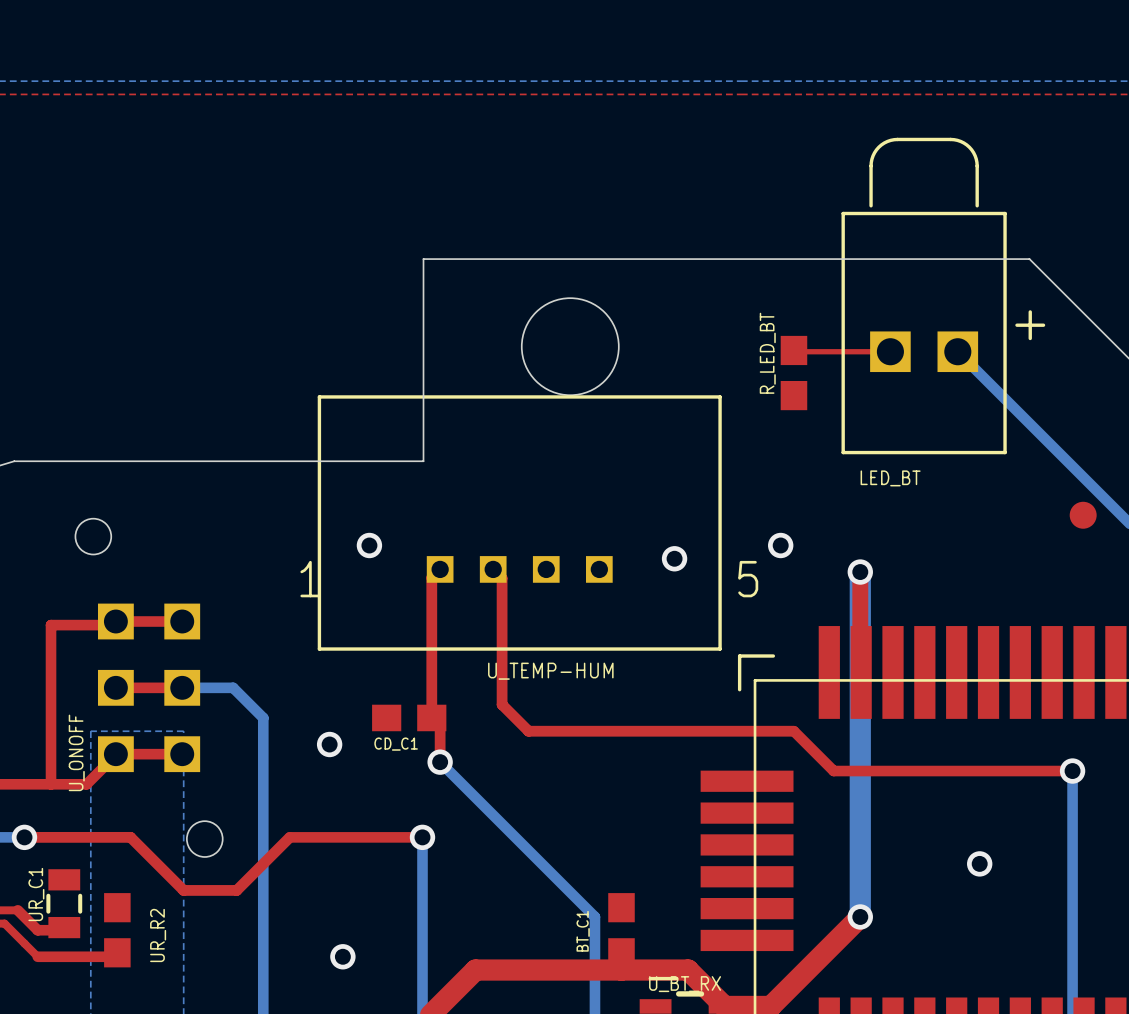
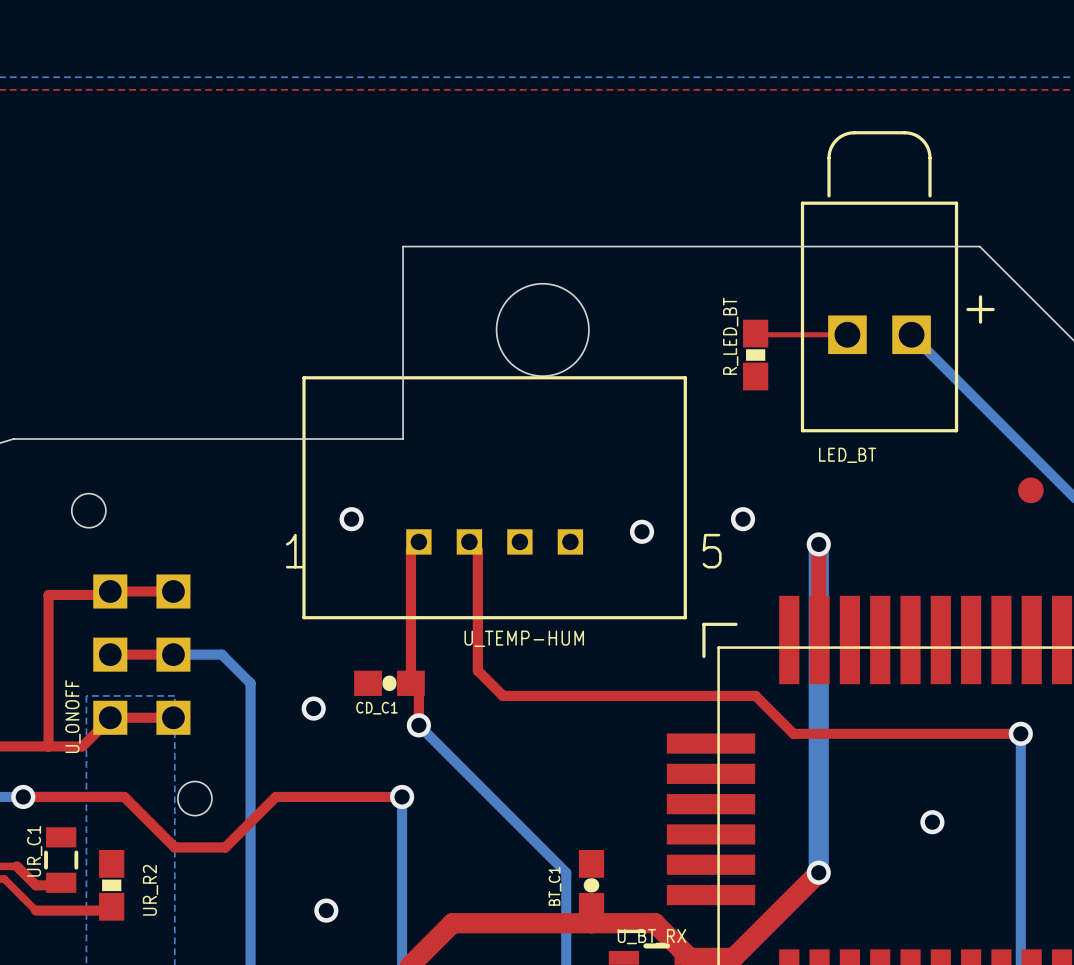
R_LED_BT footprint: [780, 335, 808, 411] -> [743, 319, 769, 391]
CD_C1 footprint: [372, 704, 447, 732] -> [354, 670, 425, 696]
UR_R2 footprint: [104, 893, 131, 968] -> [99, 849, 125, 921]
BT_C1 footprint: [608, 893, 635, 968] -> [578, 849, 605, 921]

